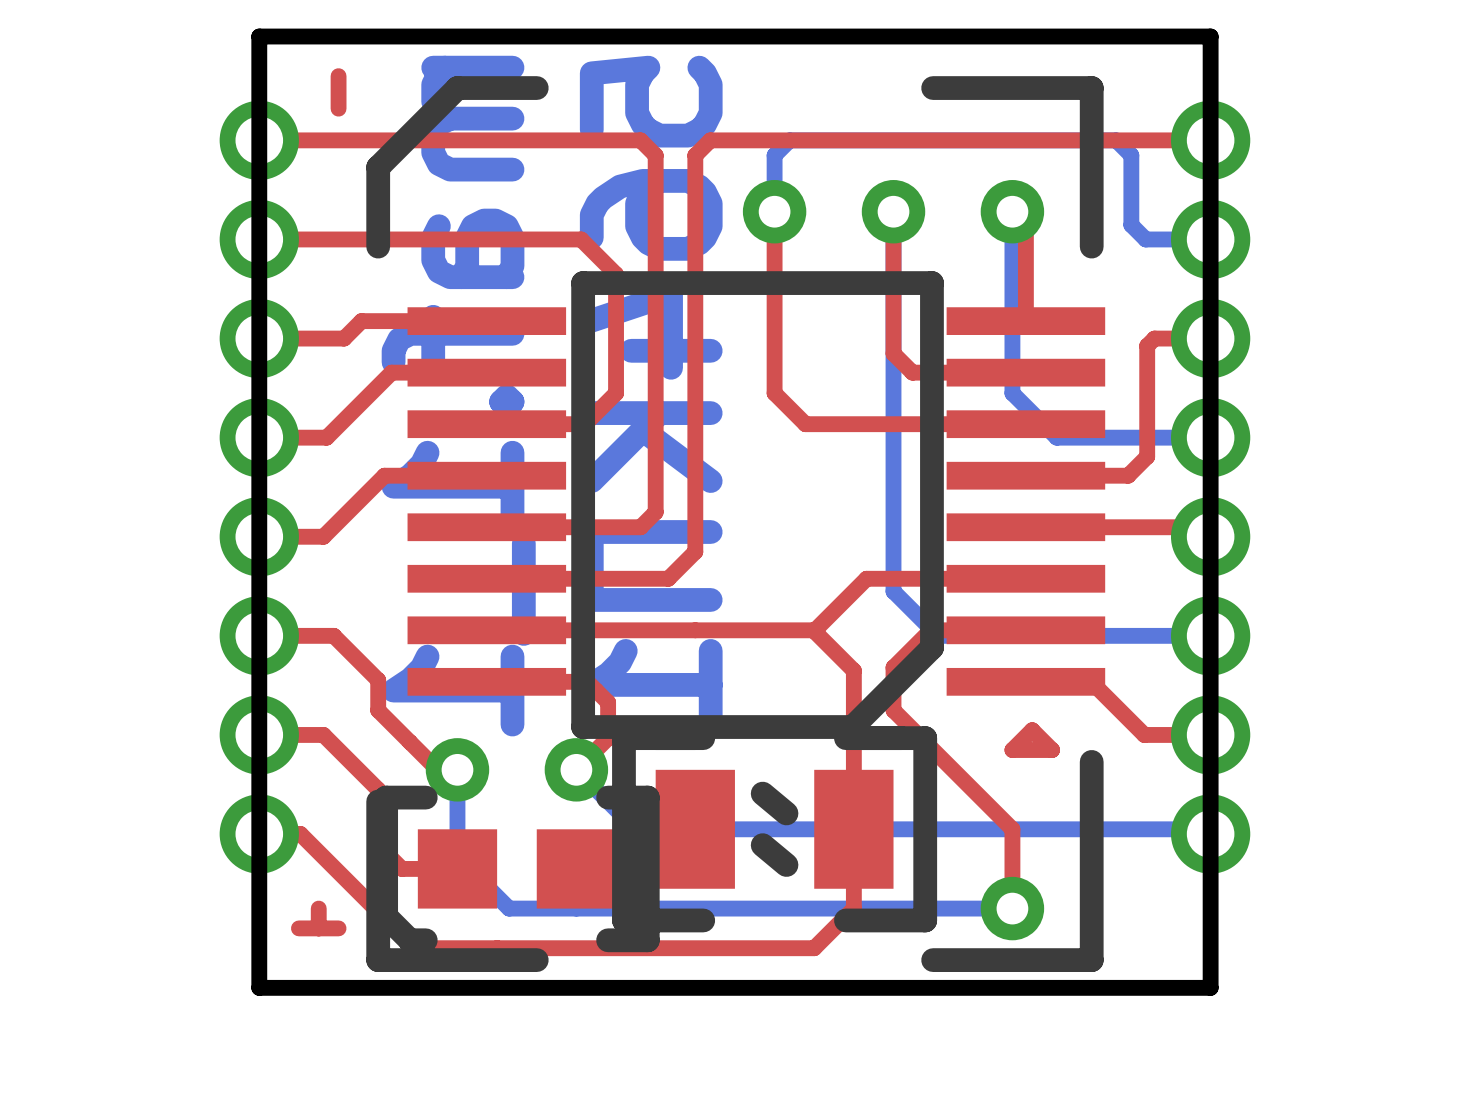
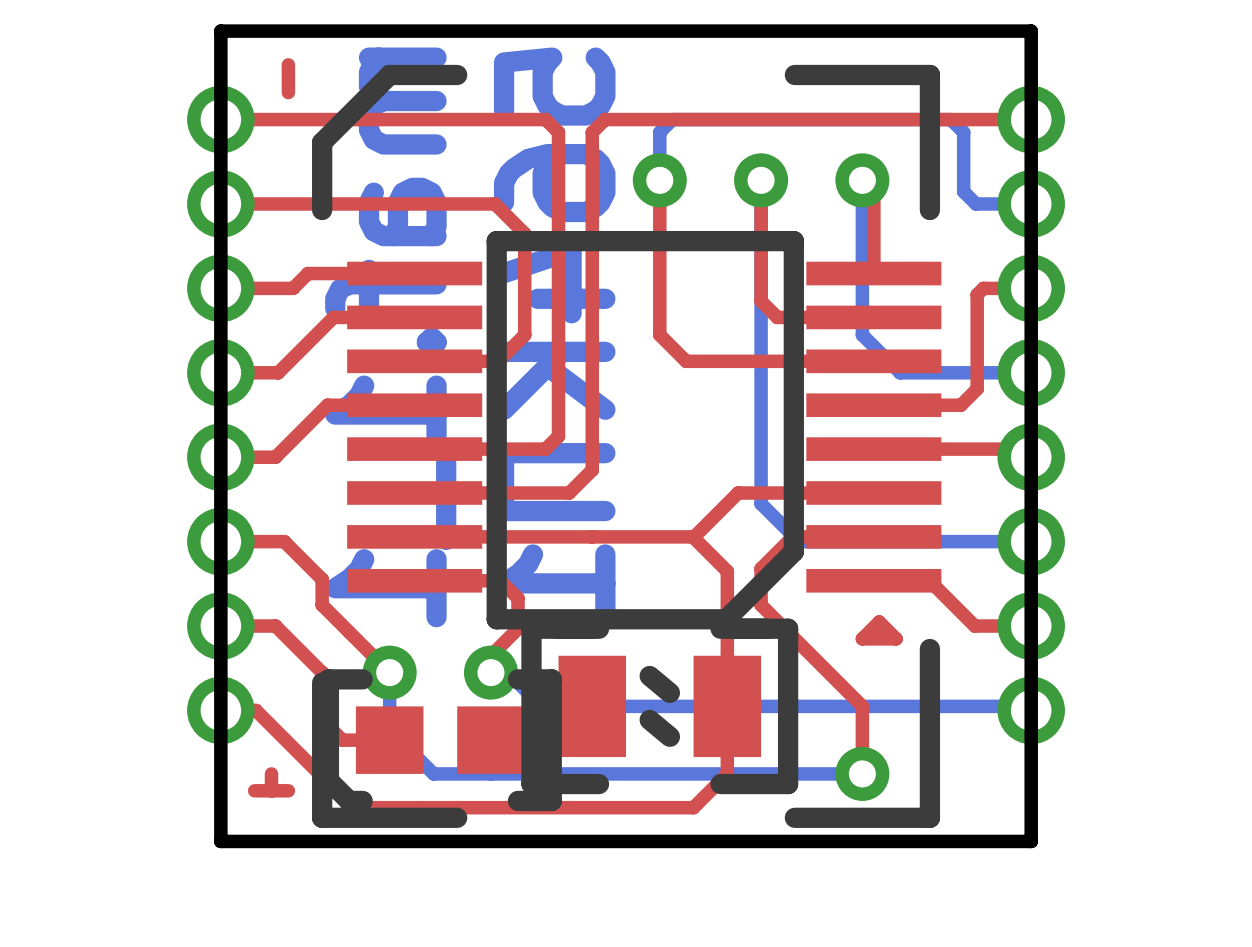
via position: (457, 769) -> (389, 672)
via position: (576, 769) -> (490, 672)

